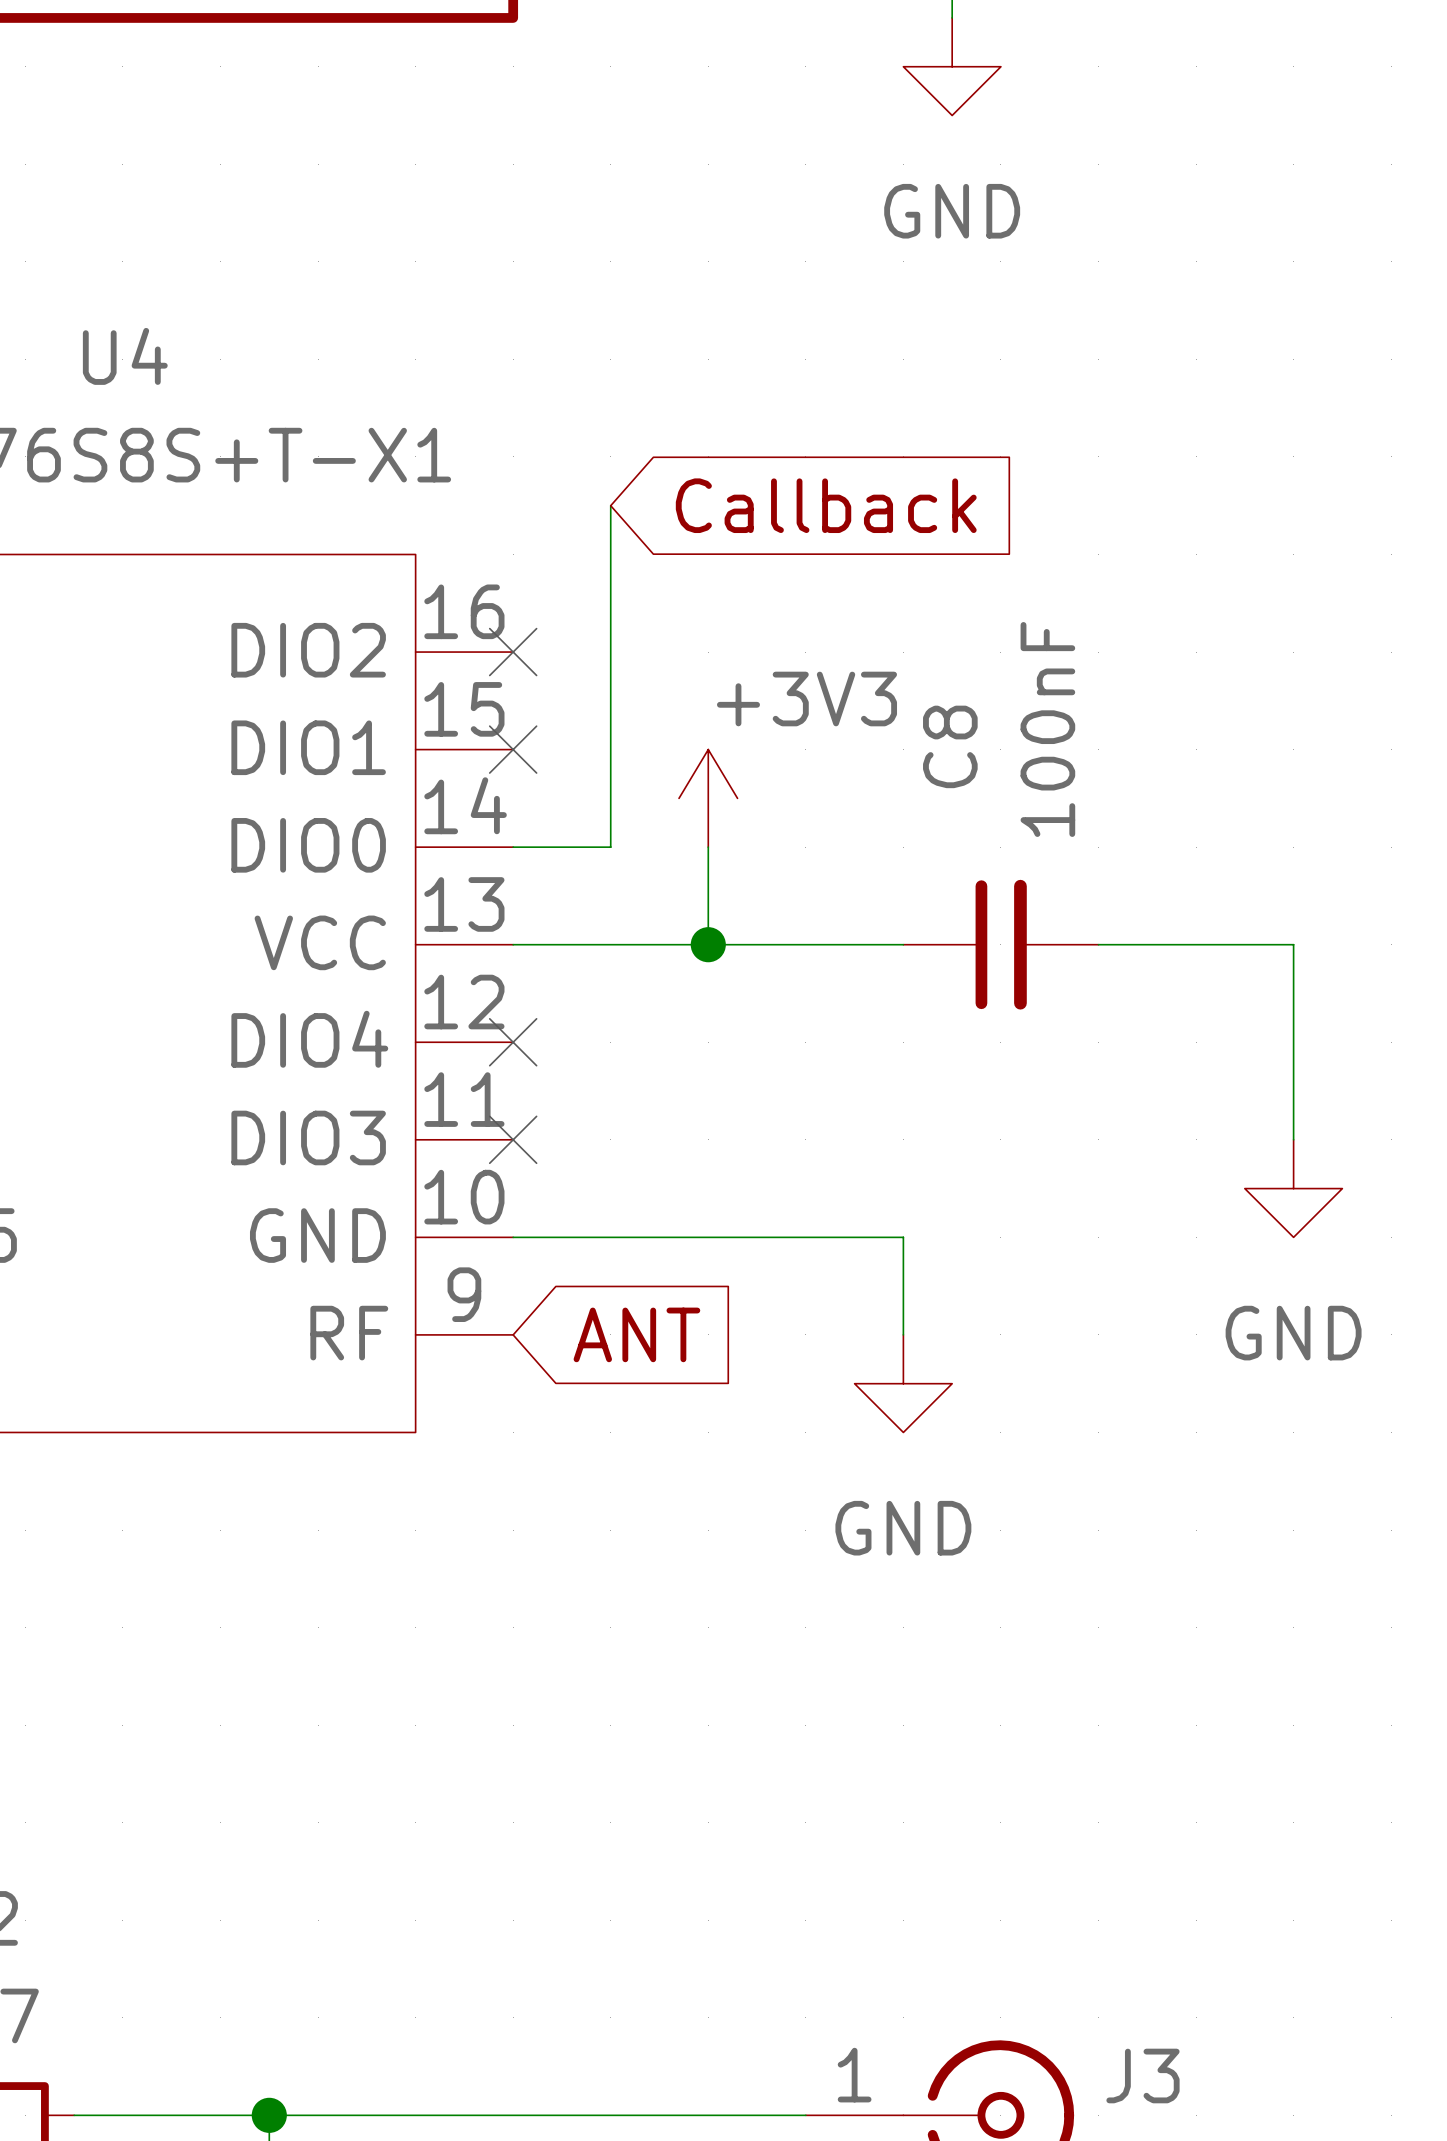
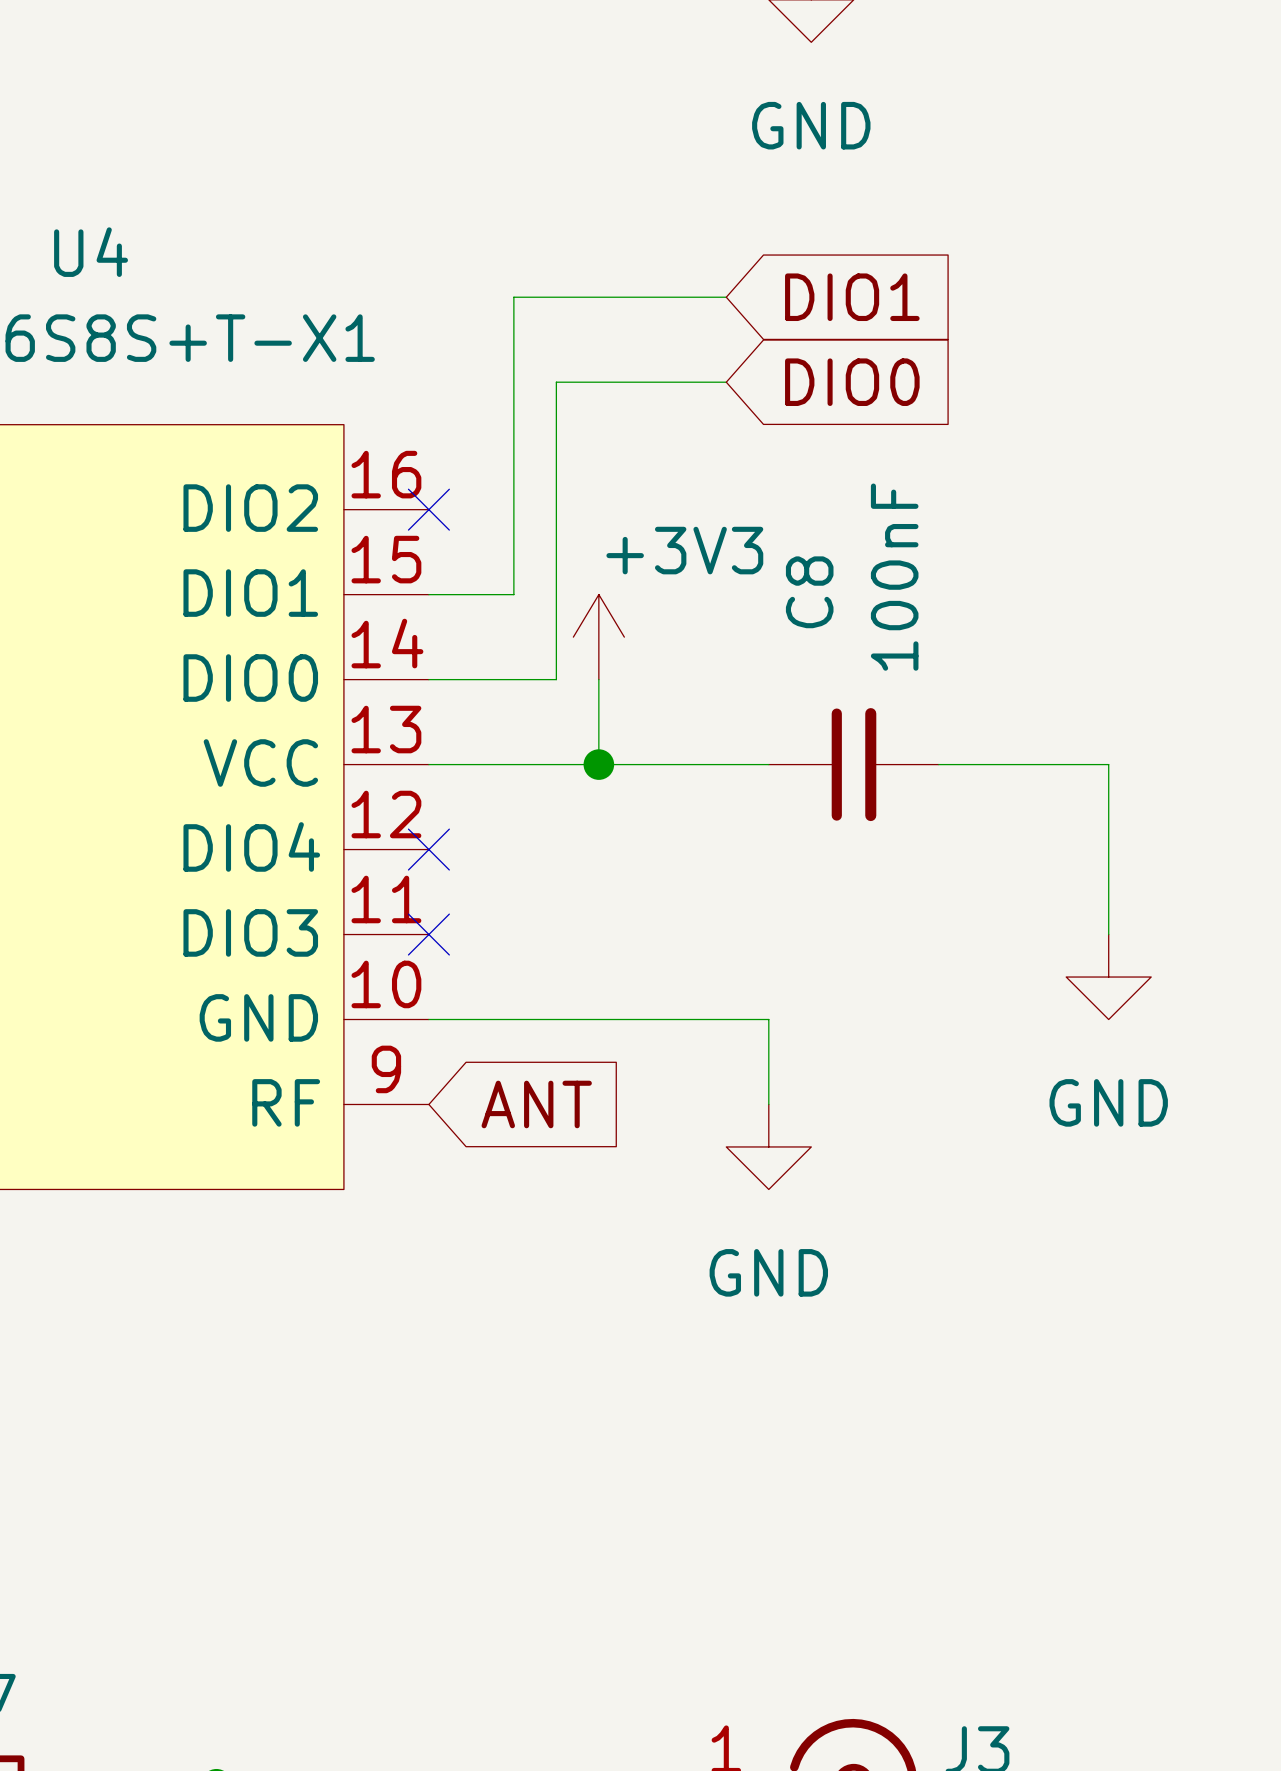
wire: none -> (726, 297) (513, 297) (513, 382)
global label: none -> DIO1 (852, 297)
global label: Callback (826, 505) -> none
wire: none -> (726, 382) (556, 382) (556, 679) (513, 679)
global label: none -> DIO0 (852, 382)
no-connect mark: (513, 749) -> none
wire: (610, 749) (610, 847) -> (513, 594) (428, 594)

